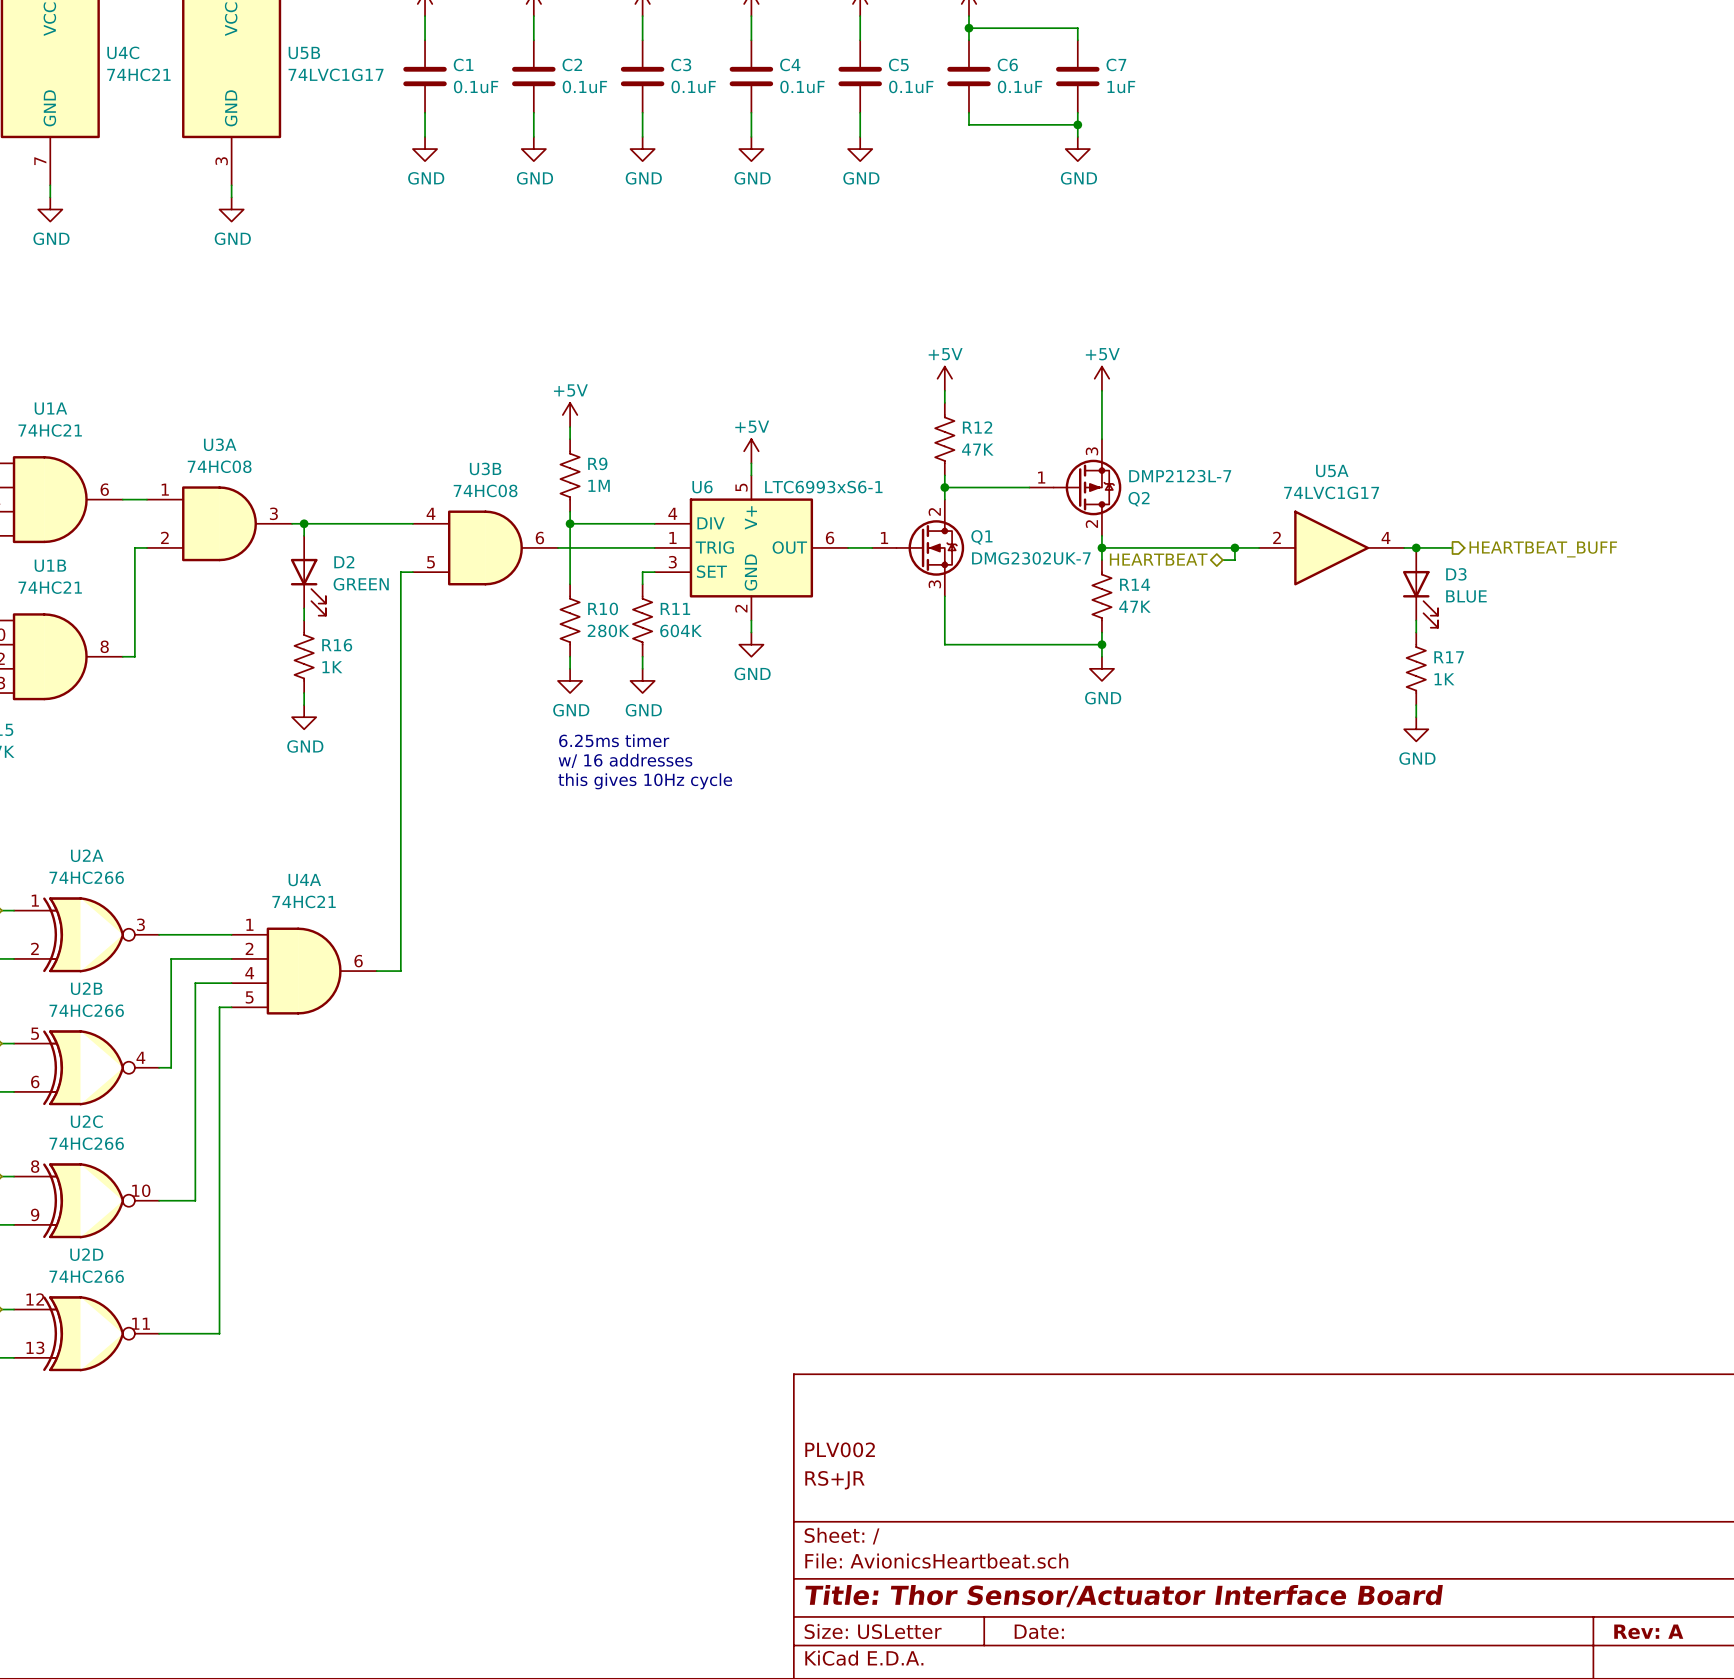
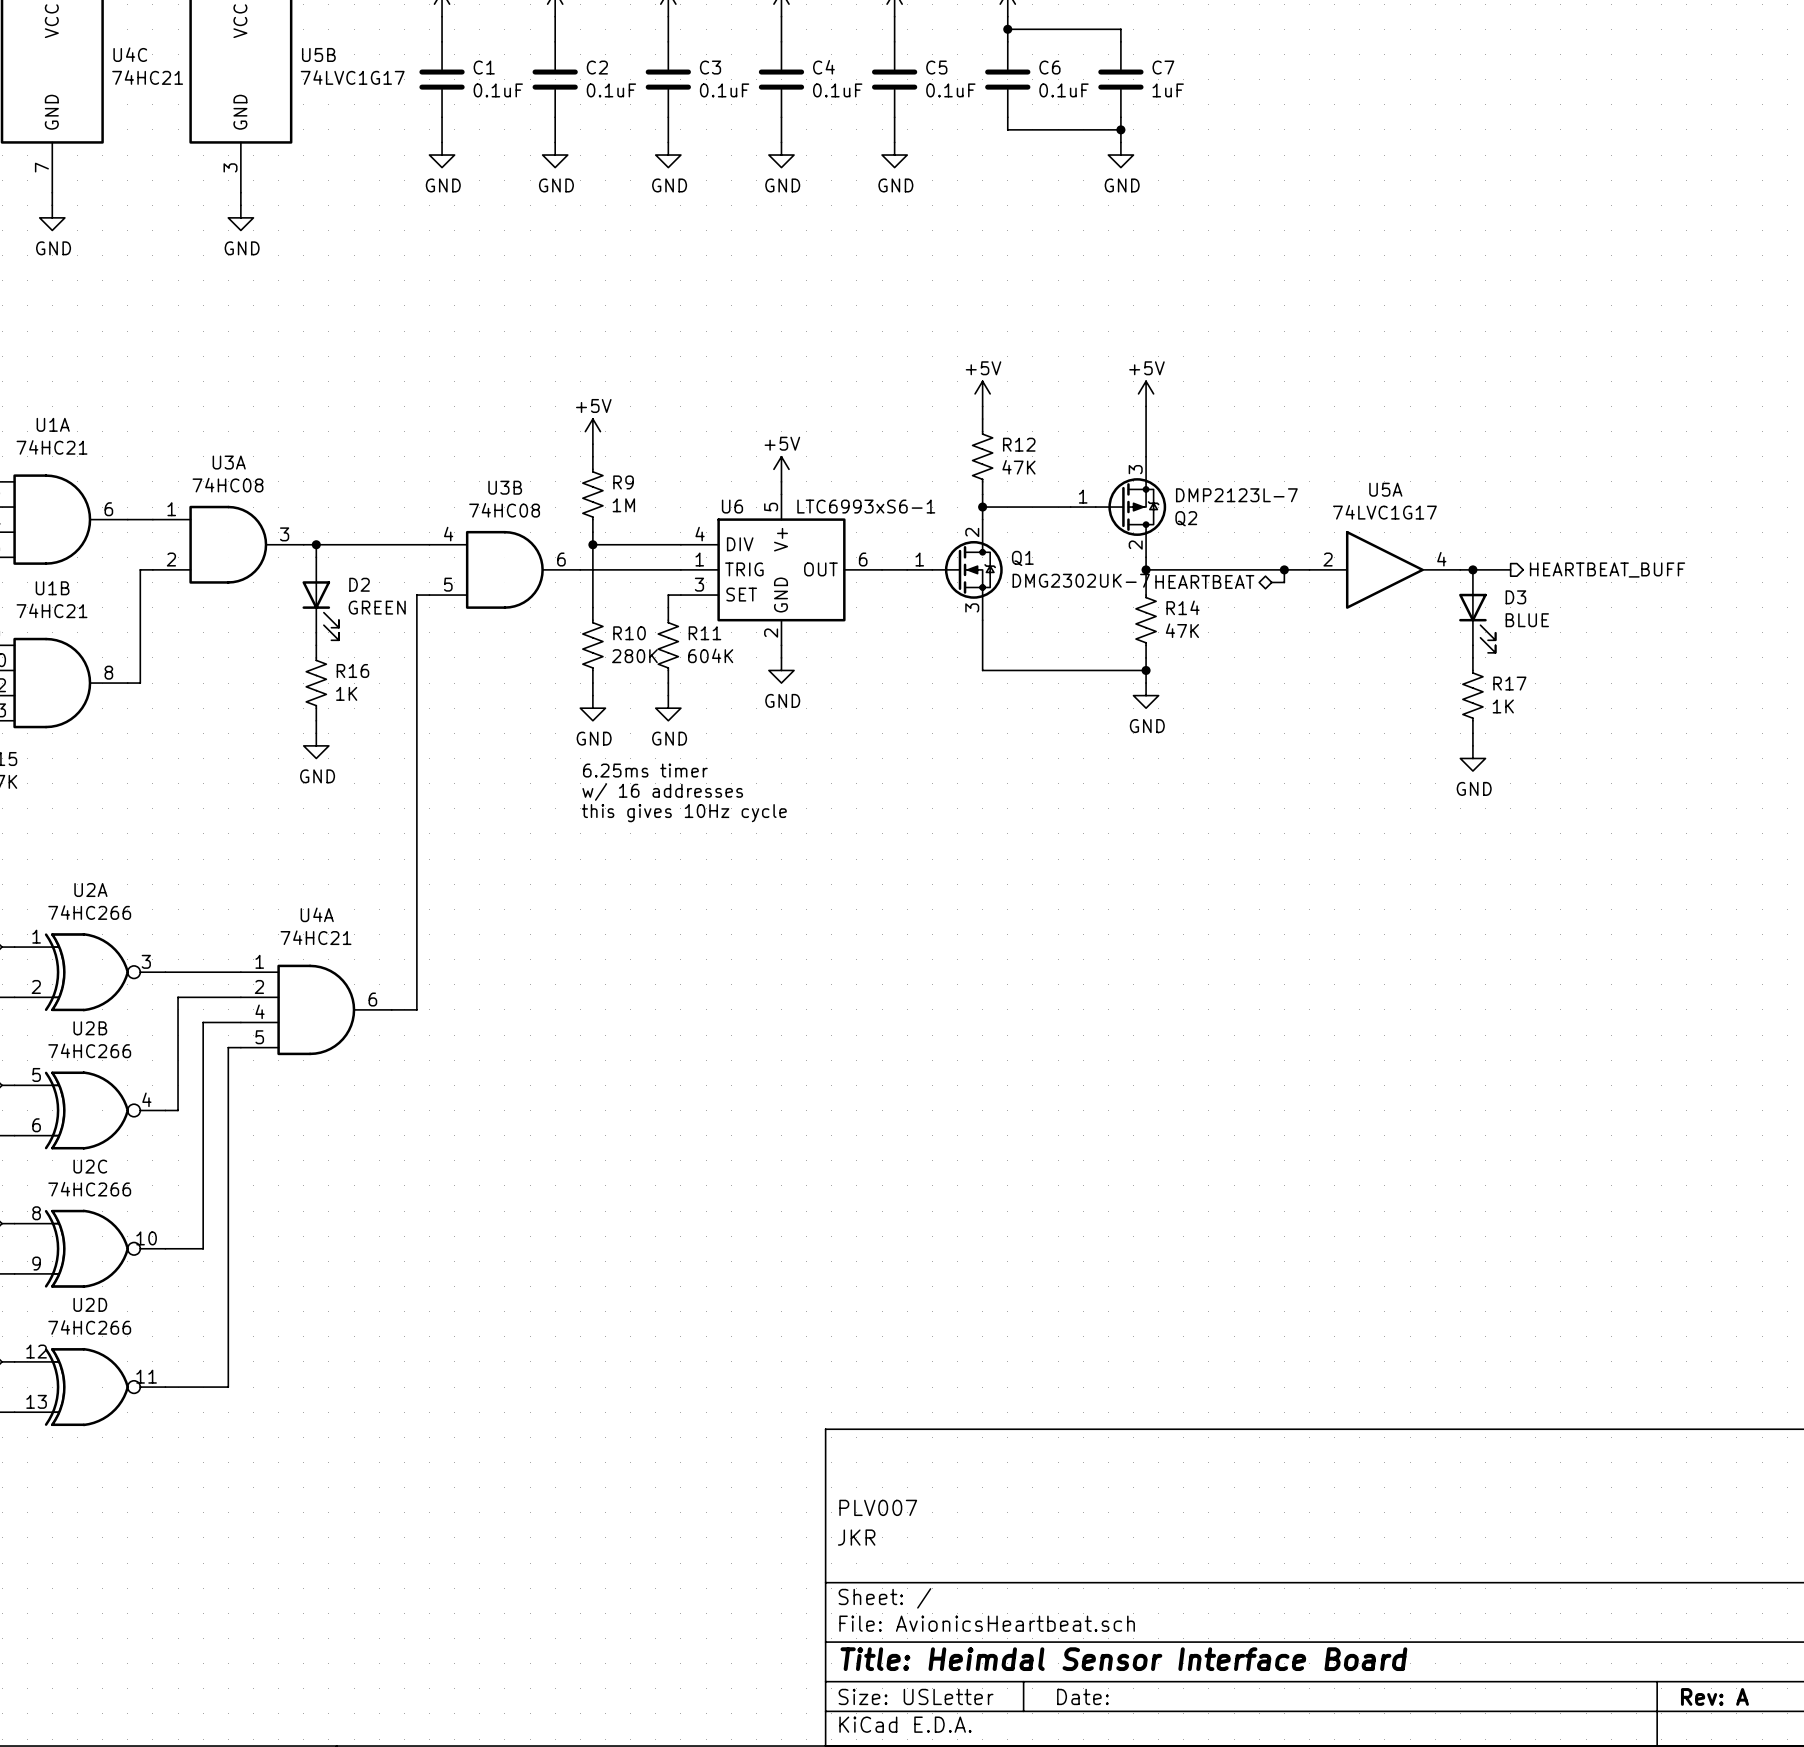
title block: PLV002 (840, 1449) -> PLV007 (878, 1507)
title block: RS+JR (834, 1480) -> JKR (856, 1537)
title block: Title: Thor Sensor/Actuator Interface Board (1124, 1596) -> Title: Heimdal Sensor Interface Board (1123, 1659)

